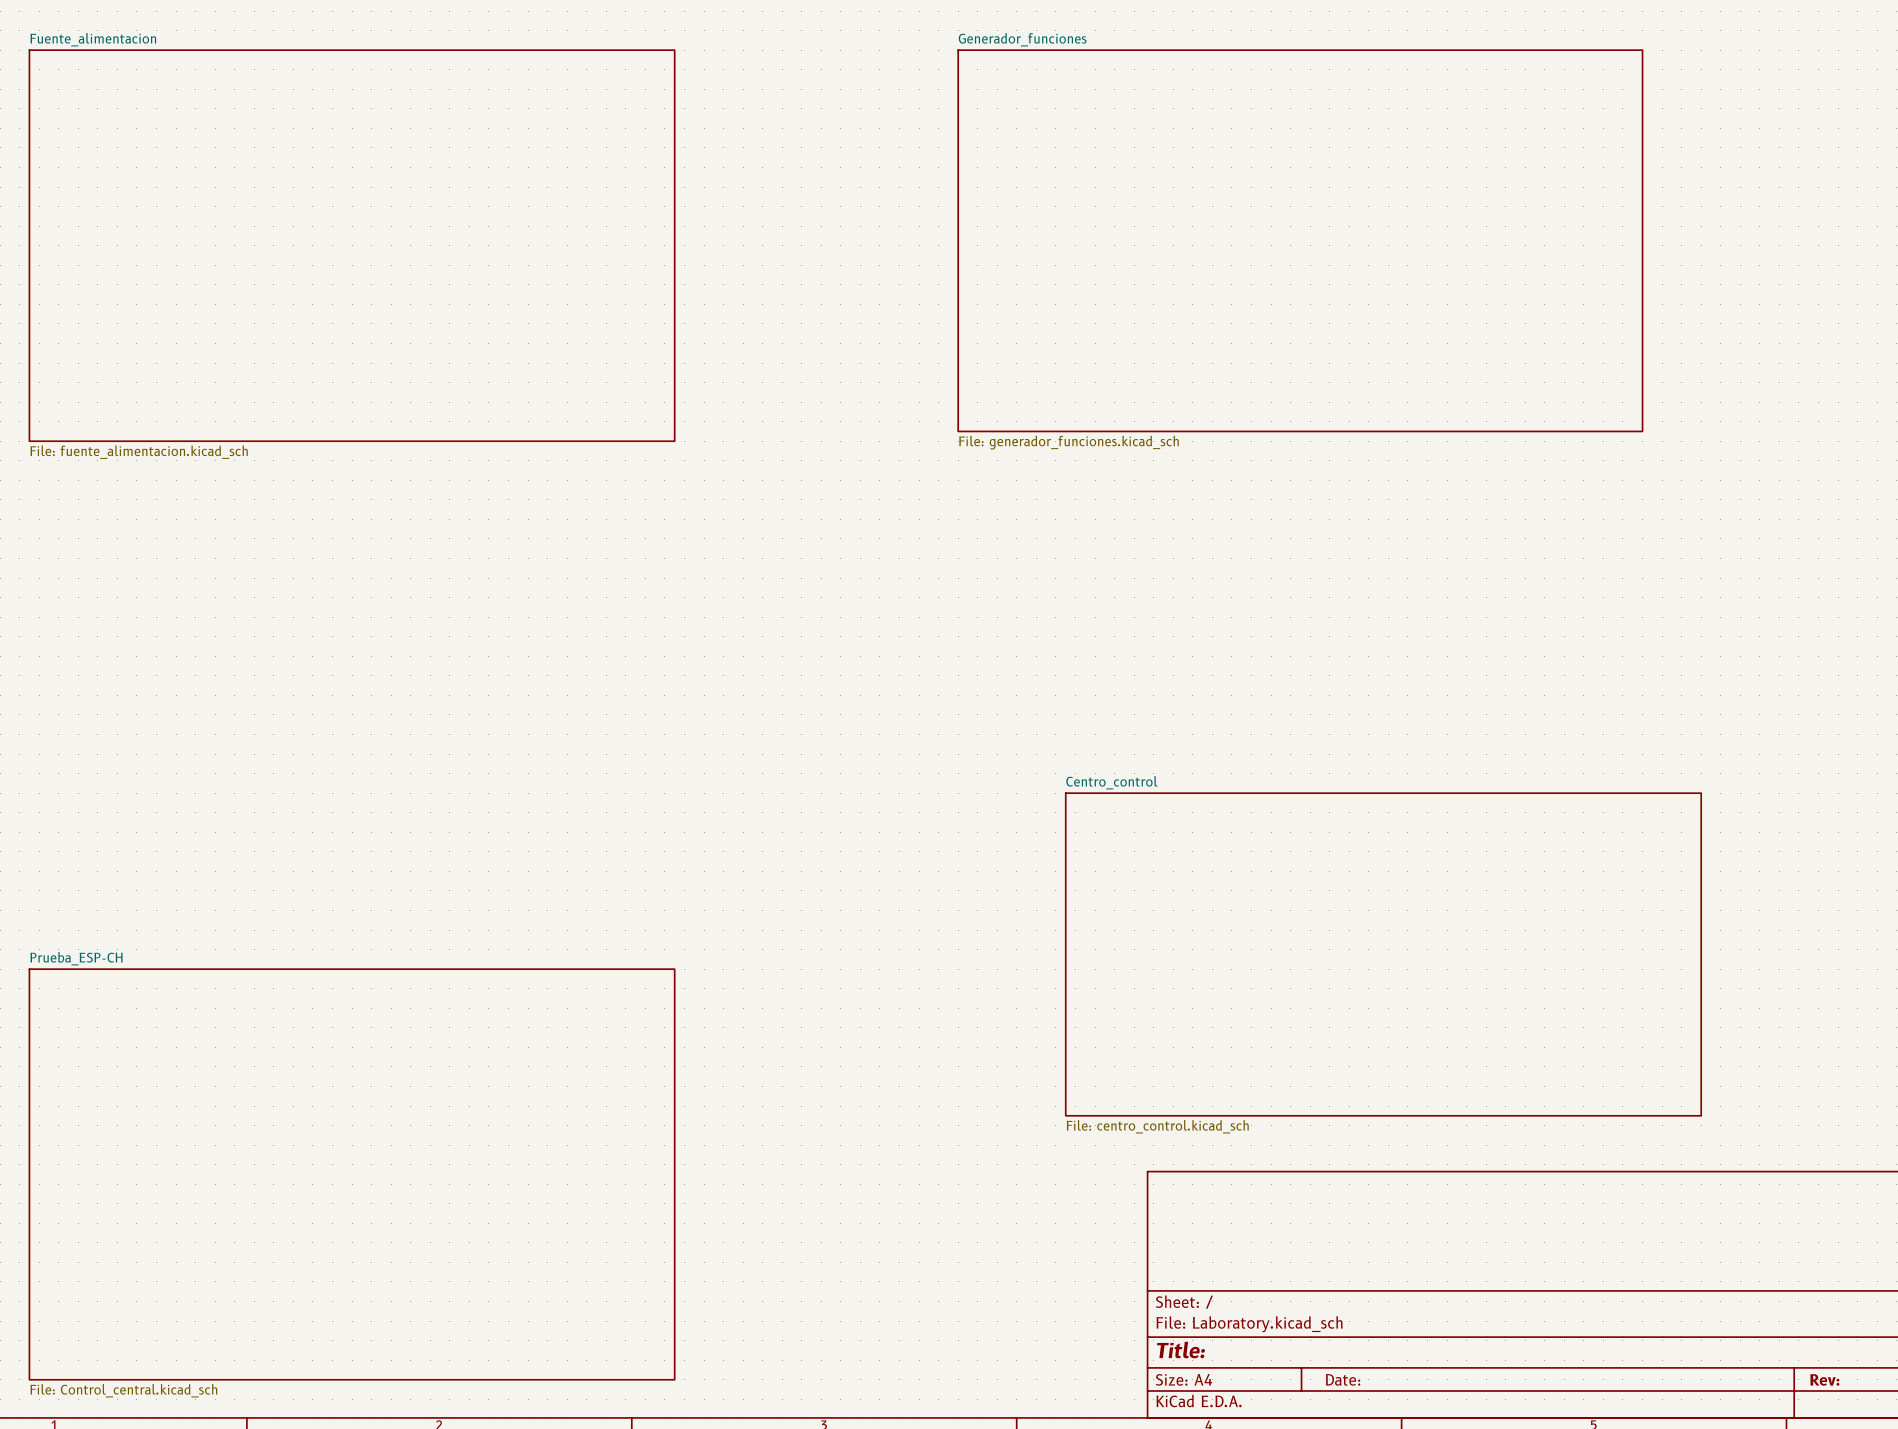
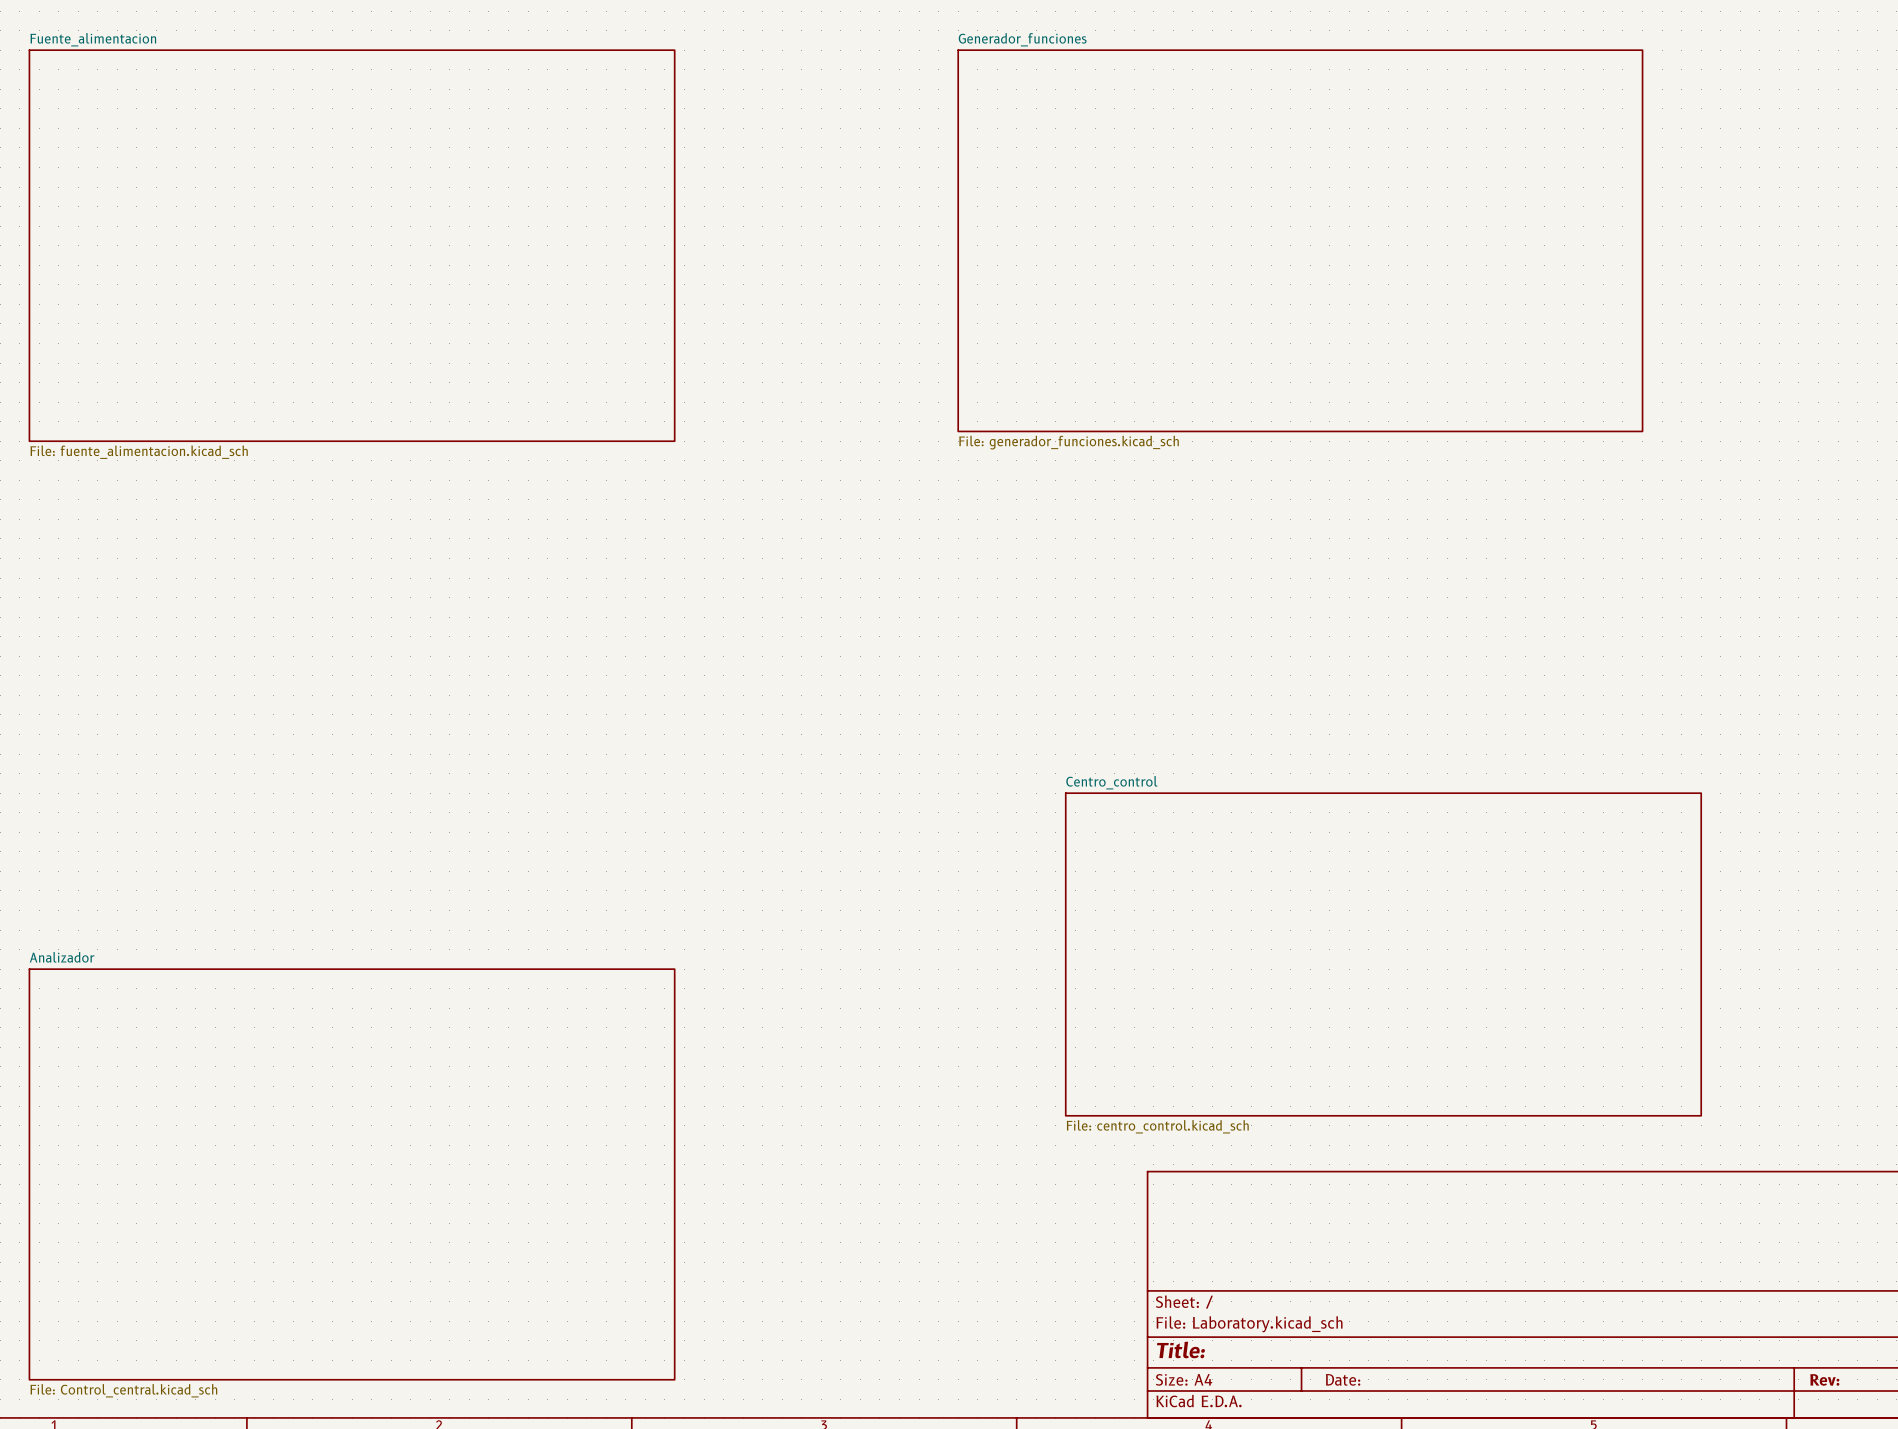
sheet Prueba_ESP-CH name: Prueba_ESP-CH (76, 958) -> Analizador (62, 957)

